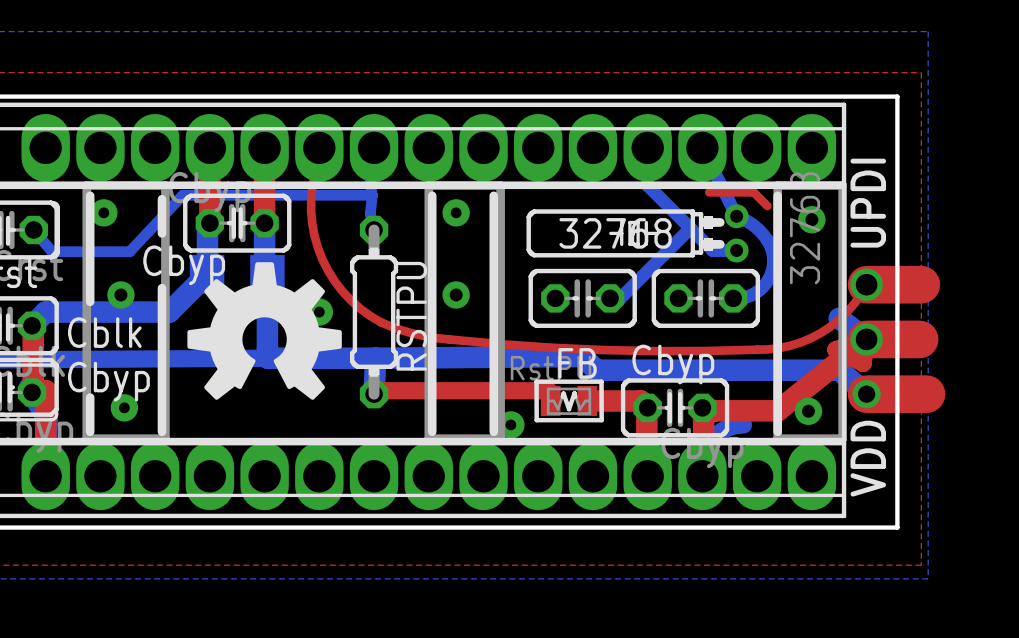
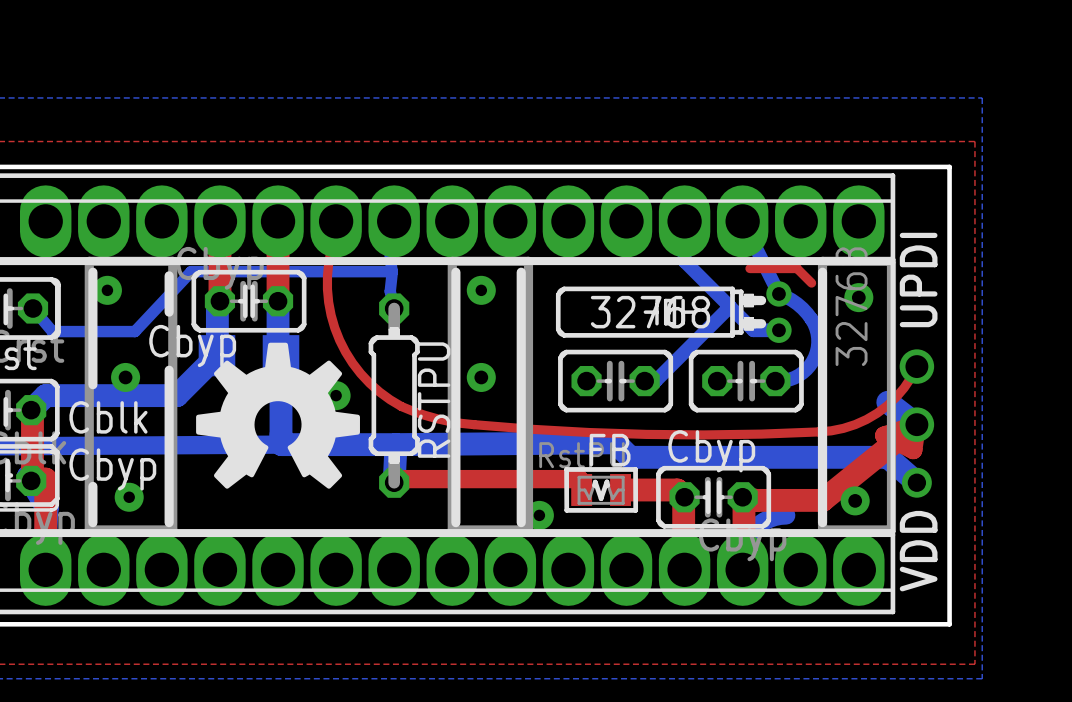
top track: (921, 284) (866, 284) (847, 311) (821, 332) (790, 345) (768, 349) (603, 350) (449, 339) -> (916, 366) (904, 387) (877, 413) (855, 424) (831, 430) (761, 434) (646, 434) (474, 424)
top track: (866, 339) (919, 339) -> none
top track: (866, 394) (926, 394) -> none

